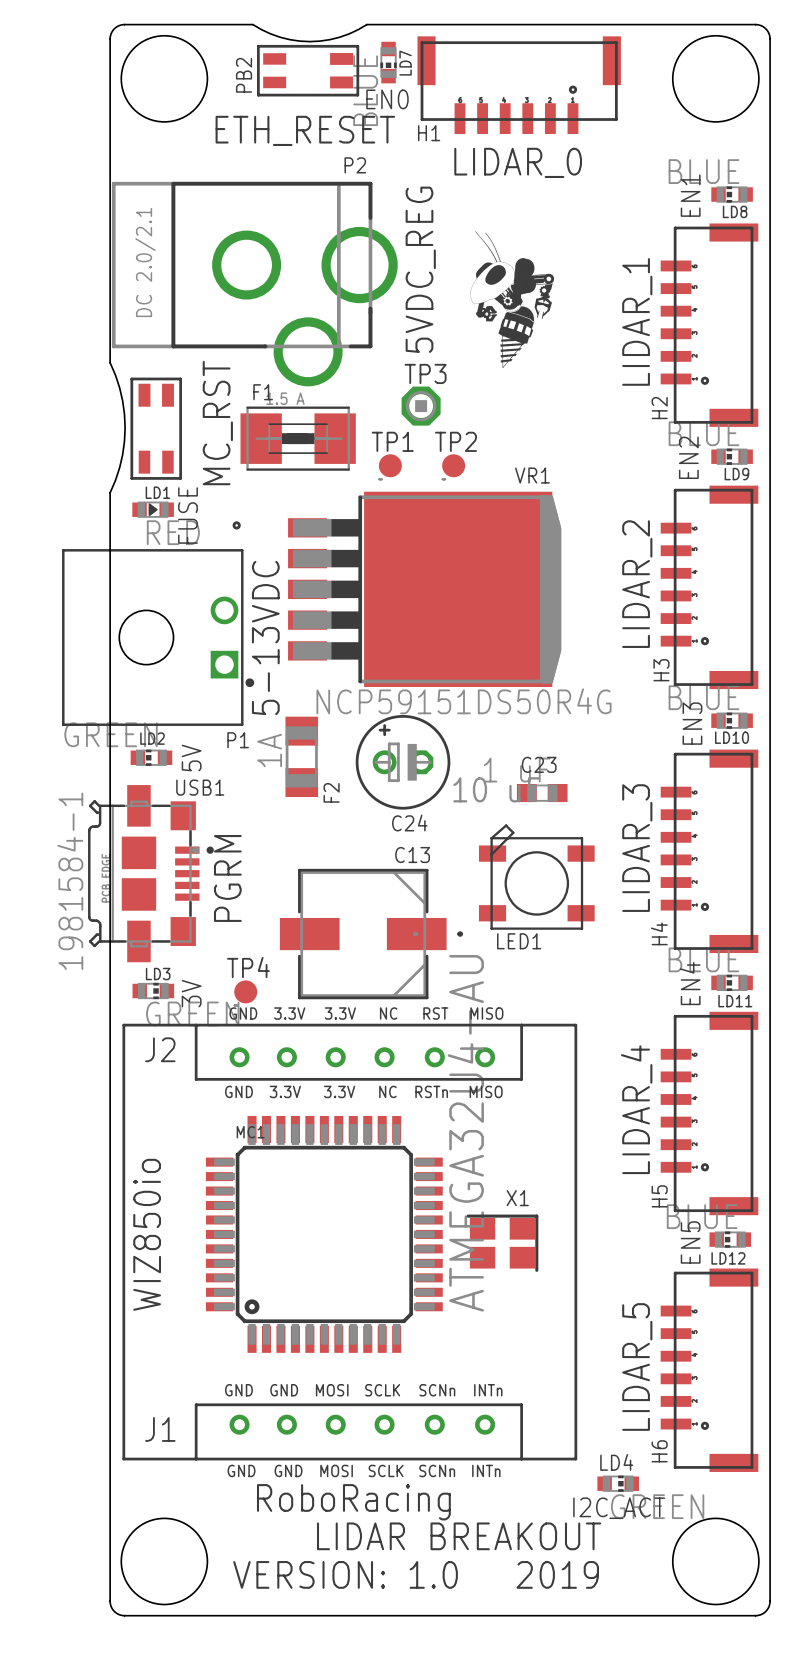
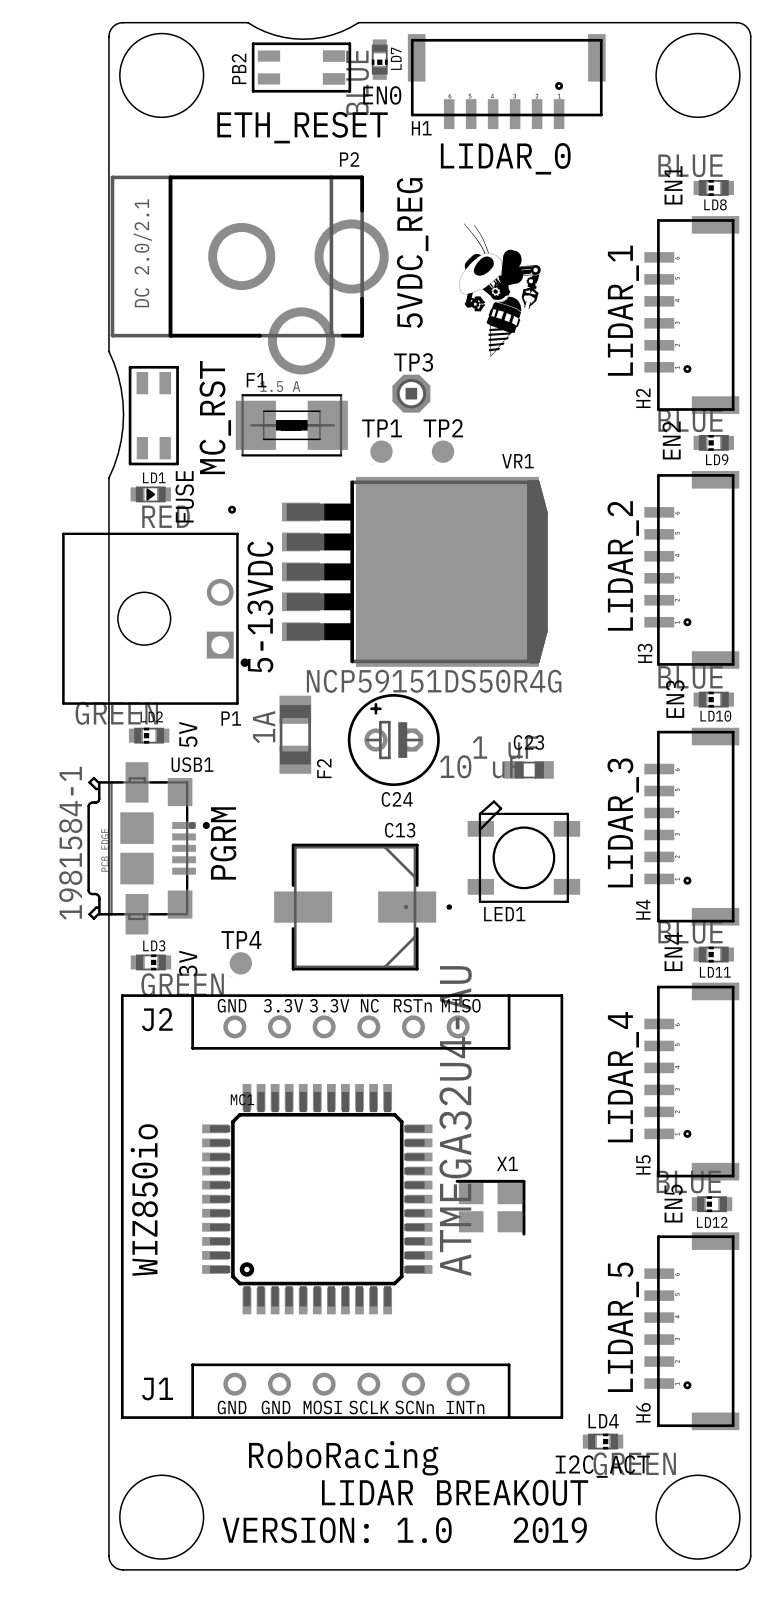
text: GND (243, 1013) -> none
text: 3.3V (289, 1013) -> none
text: 3.3V (340, 1013) -> none
text: NC (388, 1013) -> none
text: RST (435, 1013) -> none
text: MISO (486, 1013) -> none
part footprint: [122, 1023, 578, 1461] -> [120, 994, 564, 1419]
text: GND (241, 1470) -> none
text: GND (288, 1470) -> none
text: MOSI (336, 1470) -> none
text: SCLK (386, 1470) -> none
text: SCNn (437, 1470) -> none
text: INTn (486, 1470) -> none

